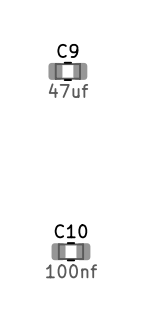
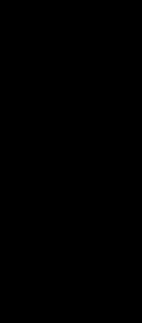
C9: 47uf (67, 71) -> none
C10: 100nf (70, 251) -> none

